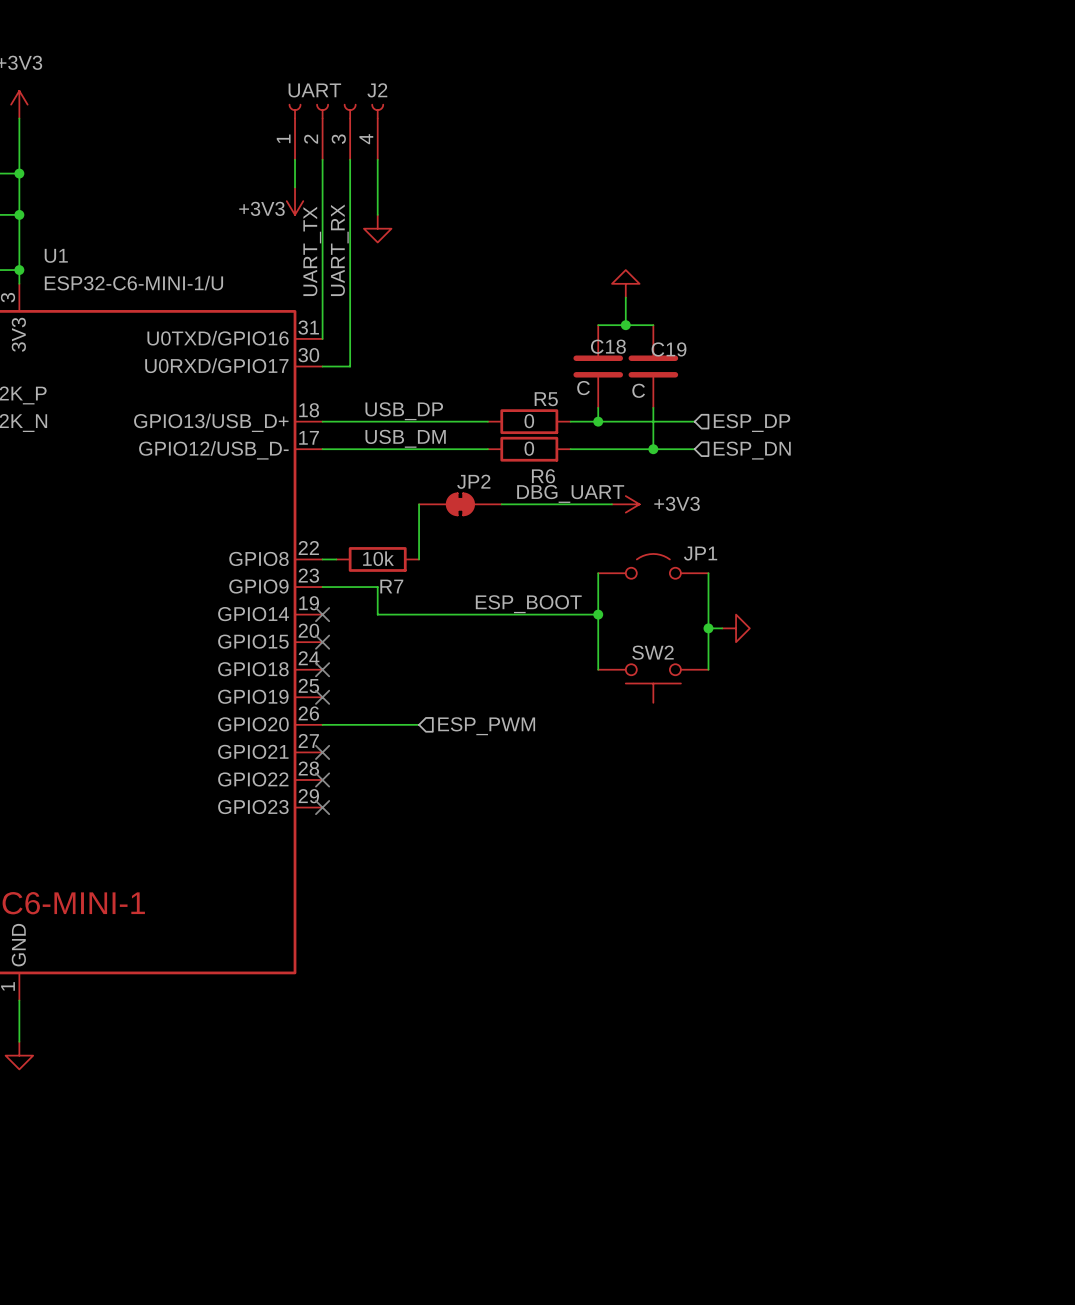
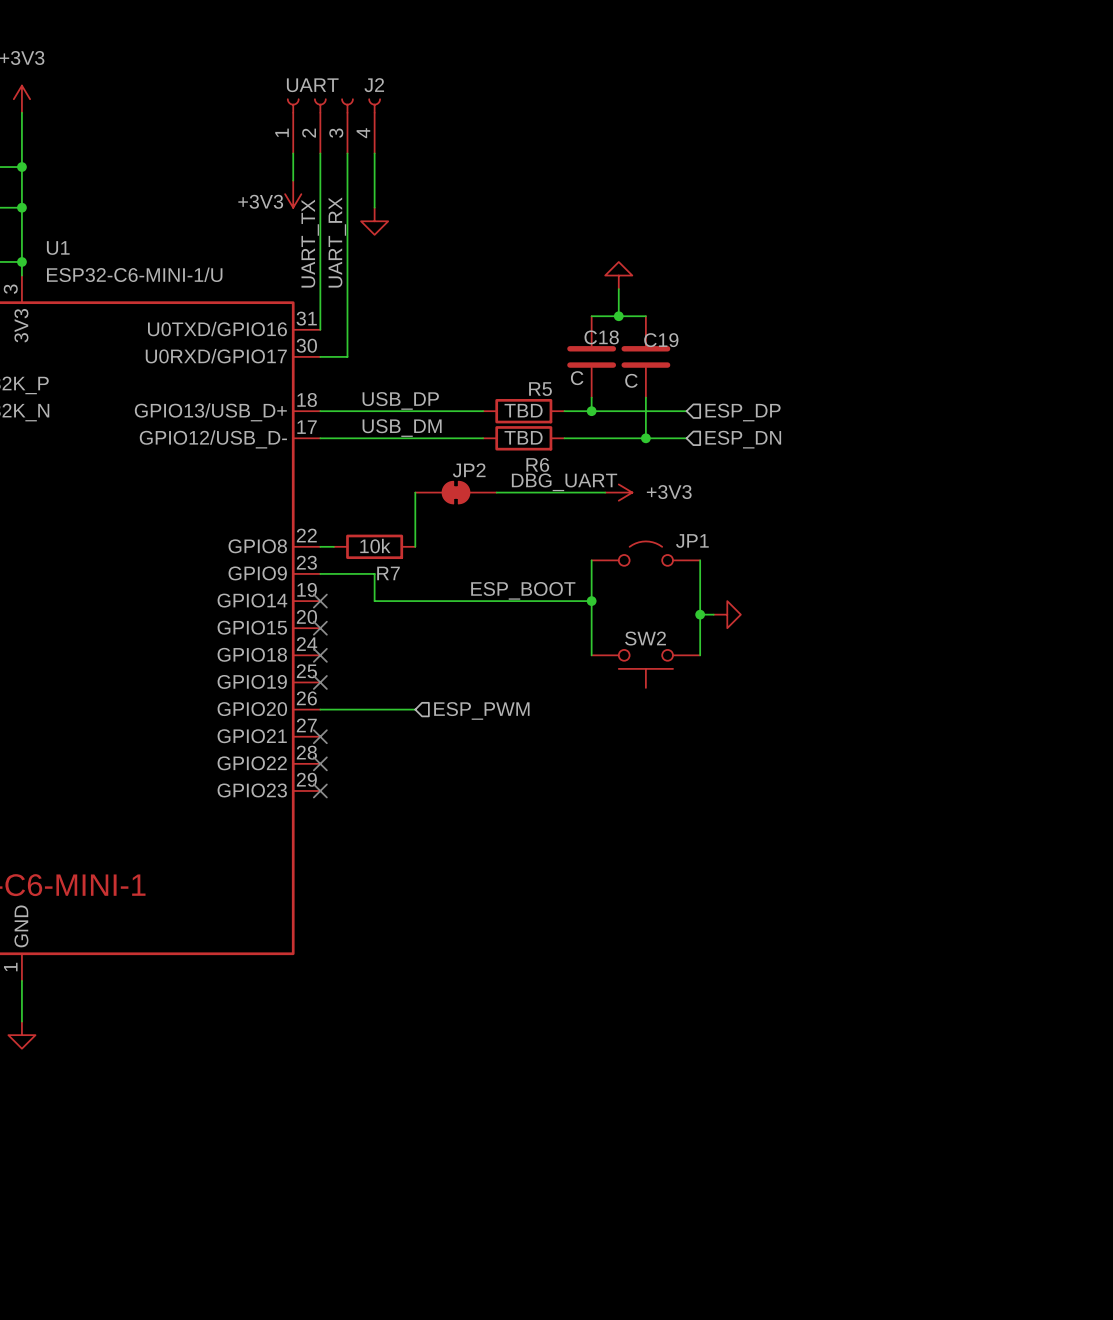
R5 value: 0 (529, 421) -> TBD (523, 410)
R6 value: 0 (529, 448) -> TBD (523, 437)

